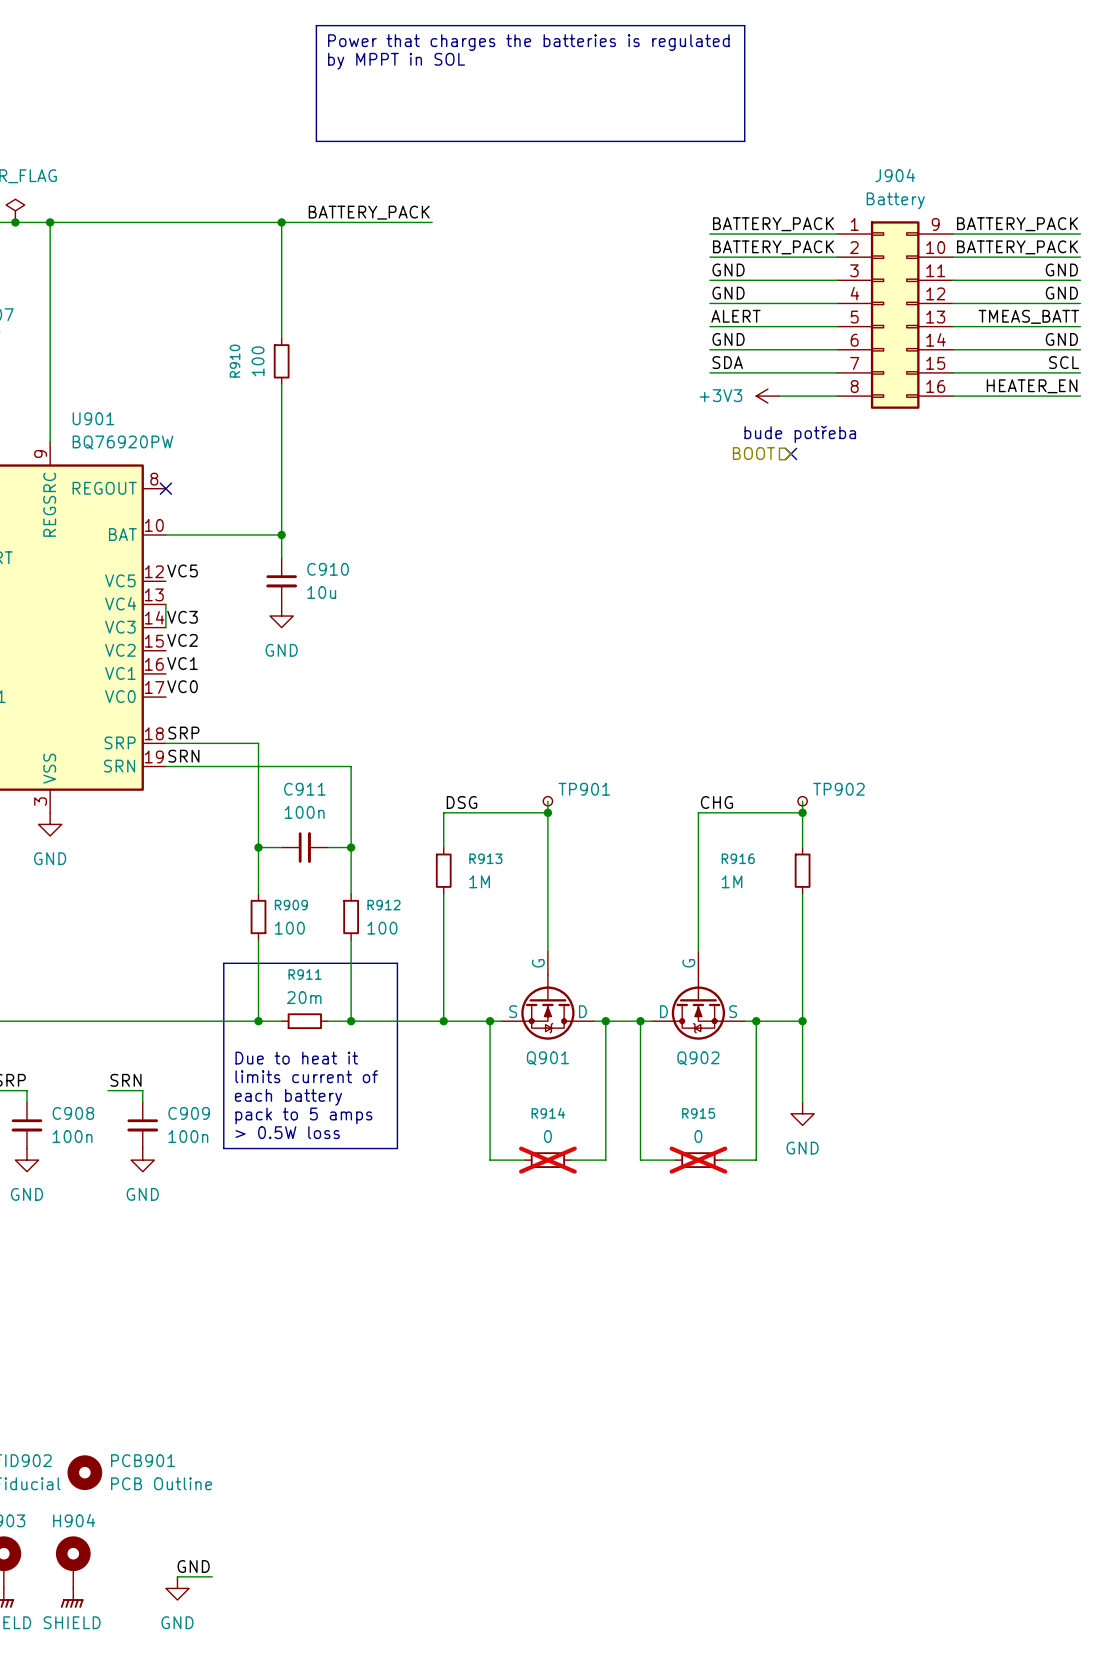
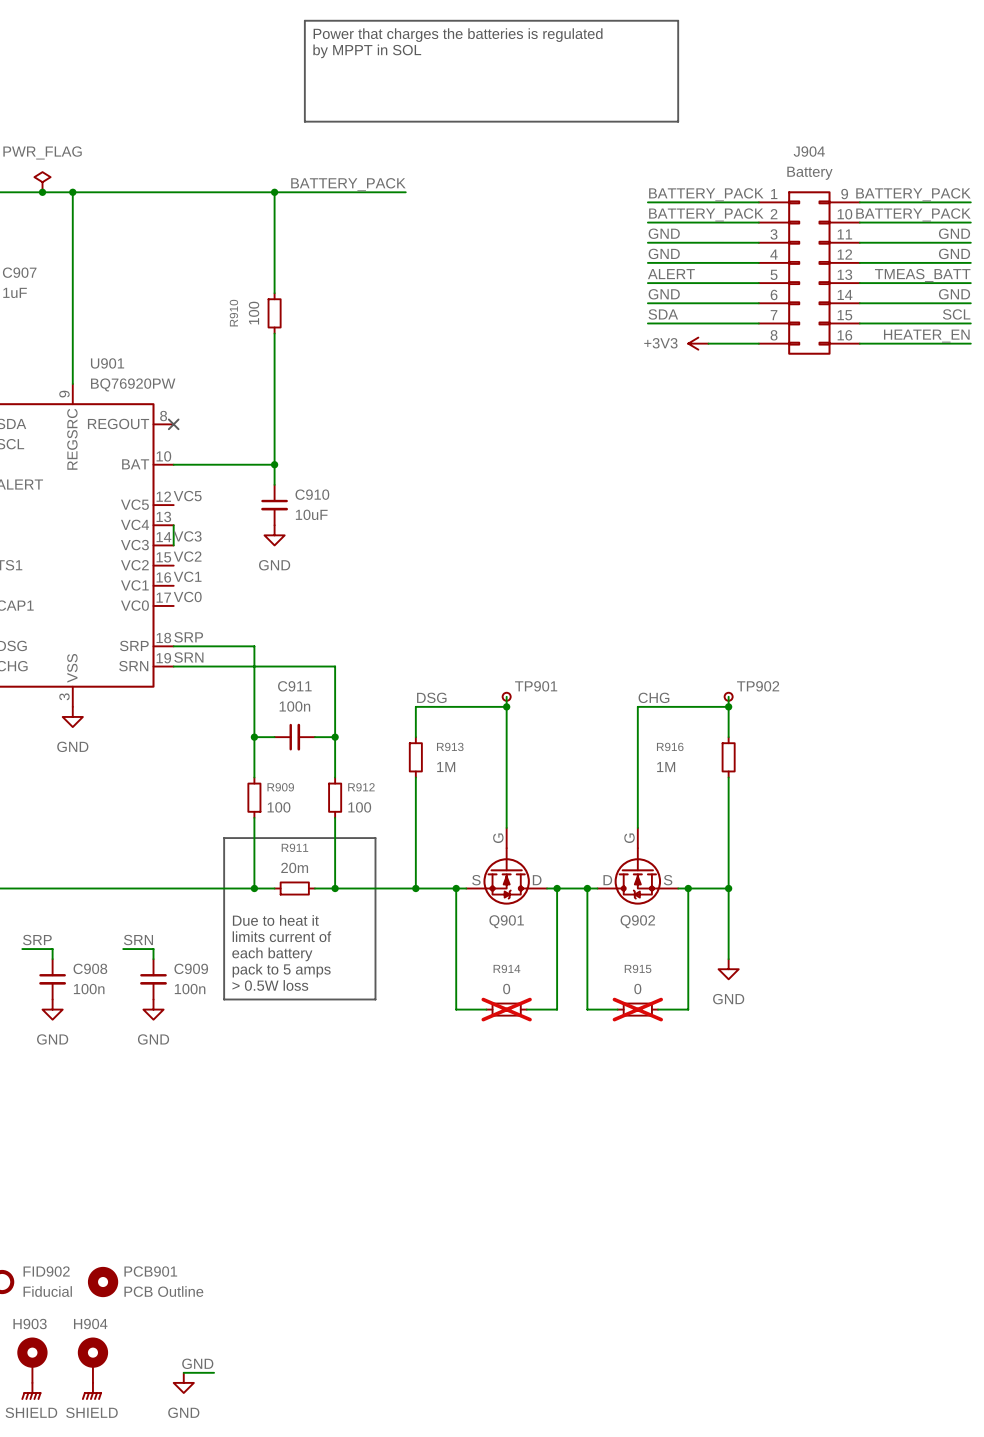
text: bude potřeba (800, 434) -> none
hierarchical label: BOOT (753, 453) -> none
no-connect mark: (791, 453) -> none
C910 value: 10u (321, 592) -> 10uF (311, 514)

